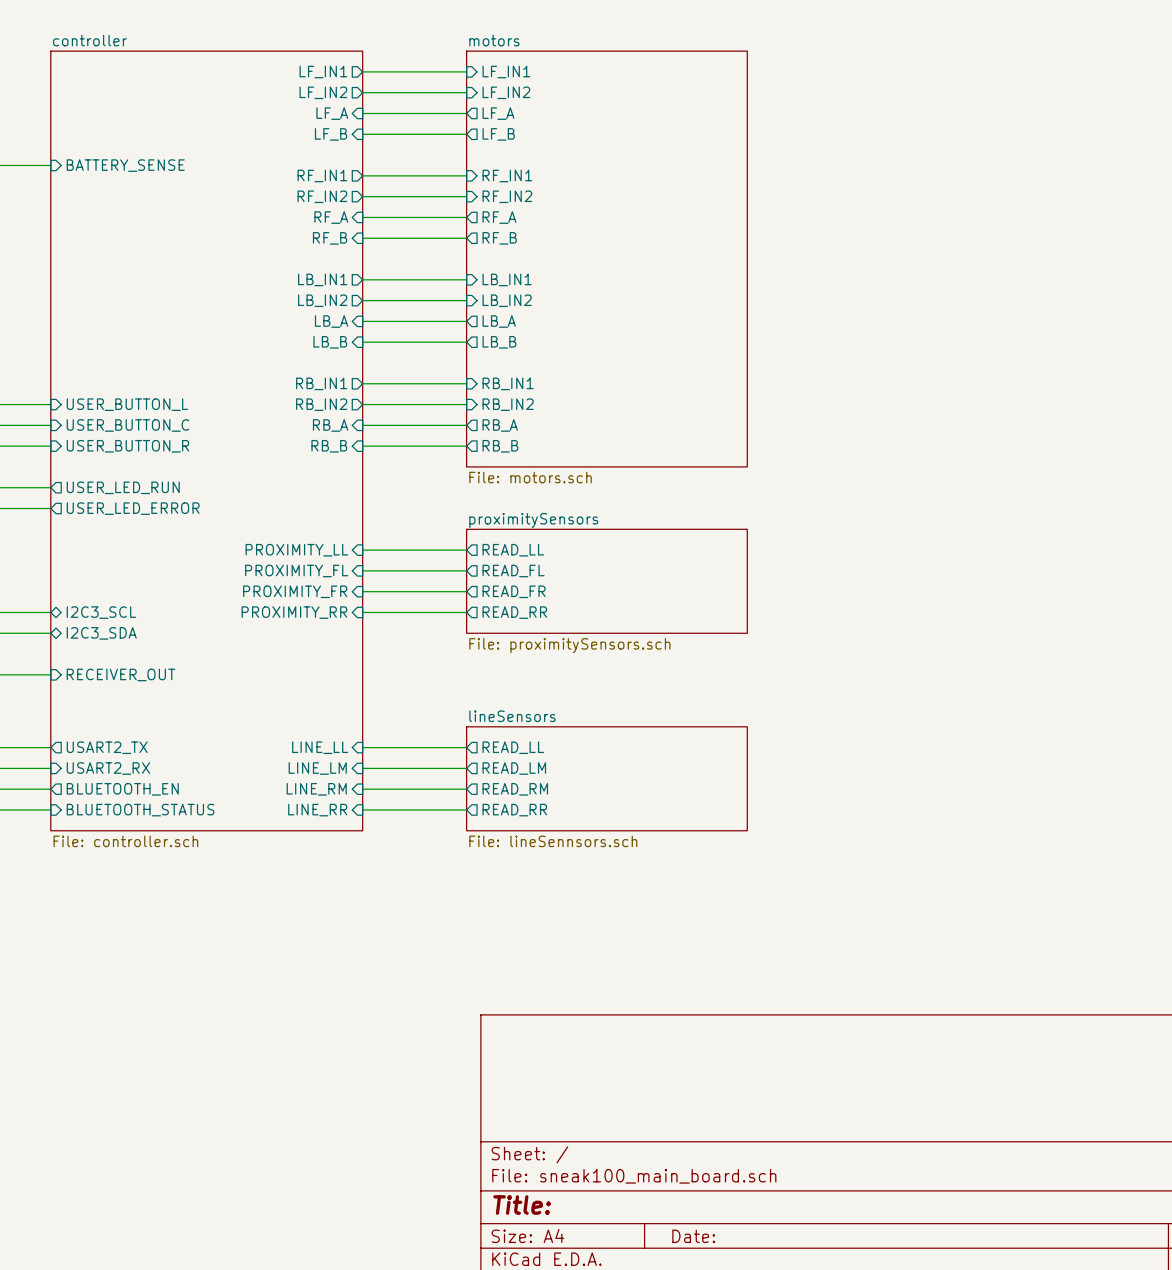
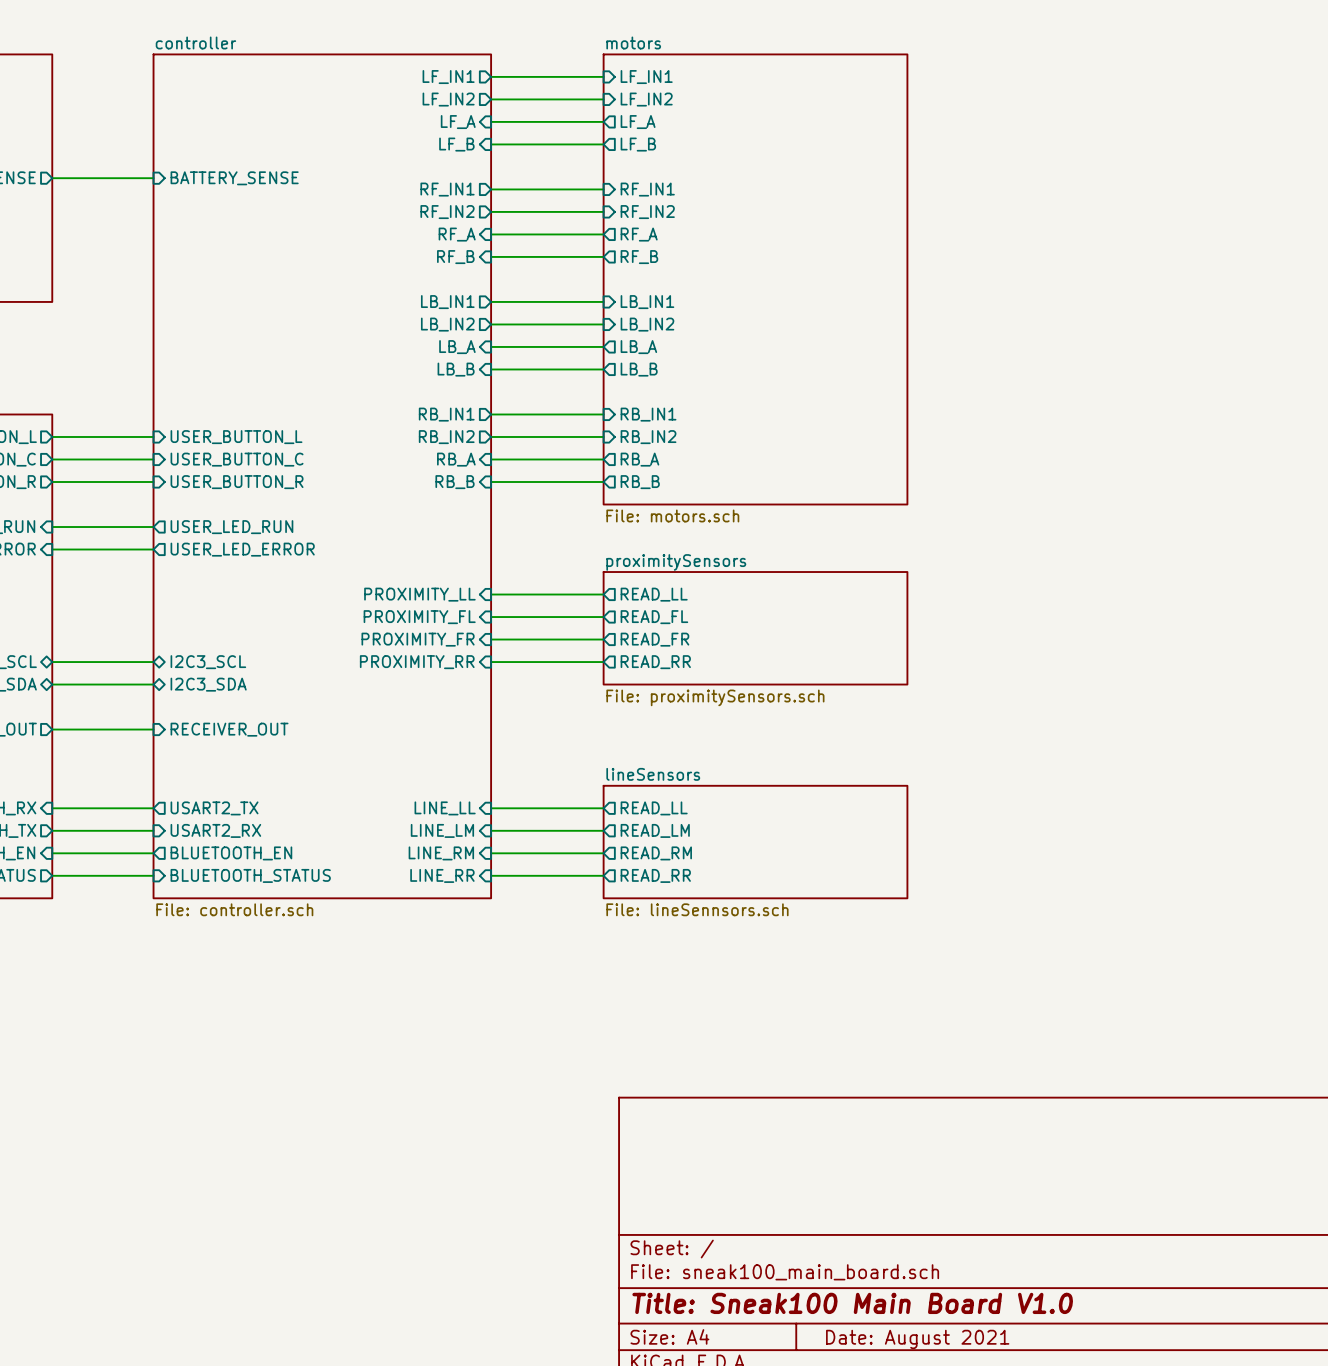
title block: Title: (522, 1205) -> Title: Sneak100 Main Board V1.0 (852, 1303)
title block: Date: (693, 1236) -> Date: August 2021 (917, 1339)

